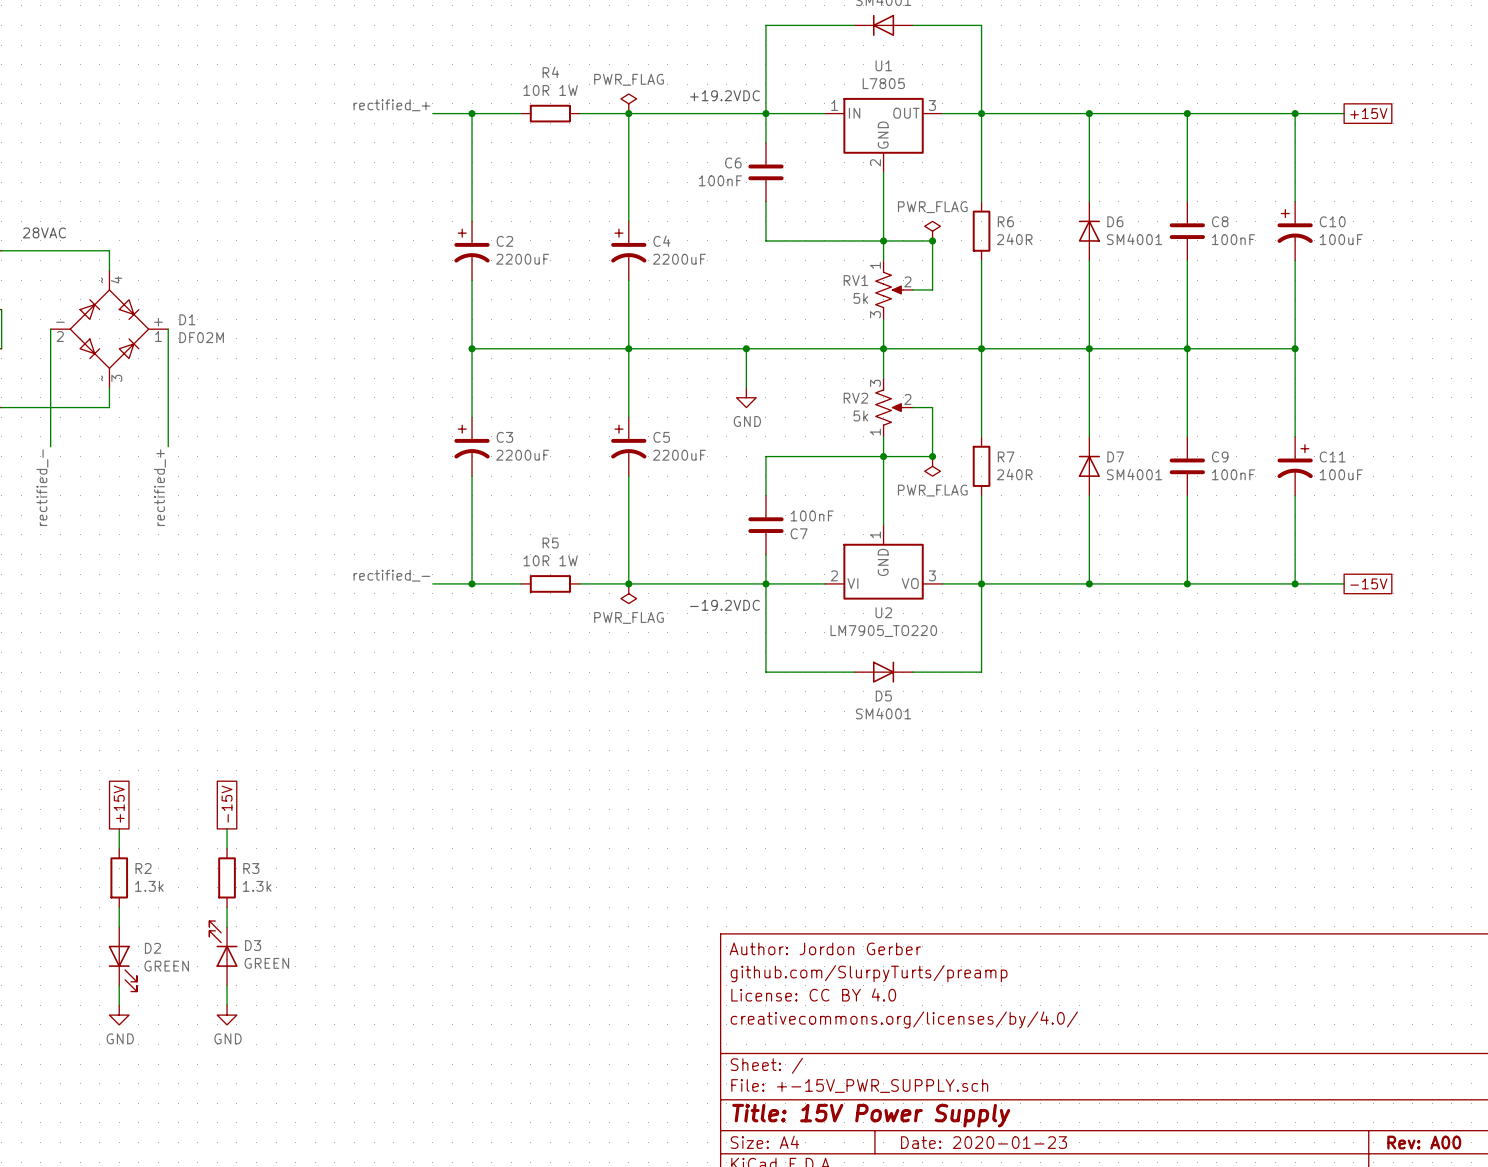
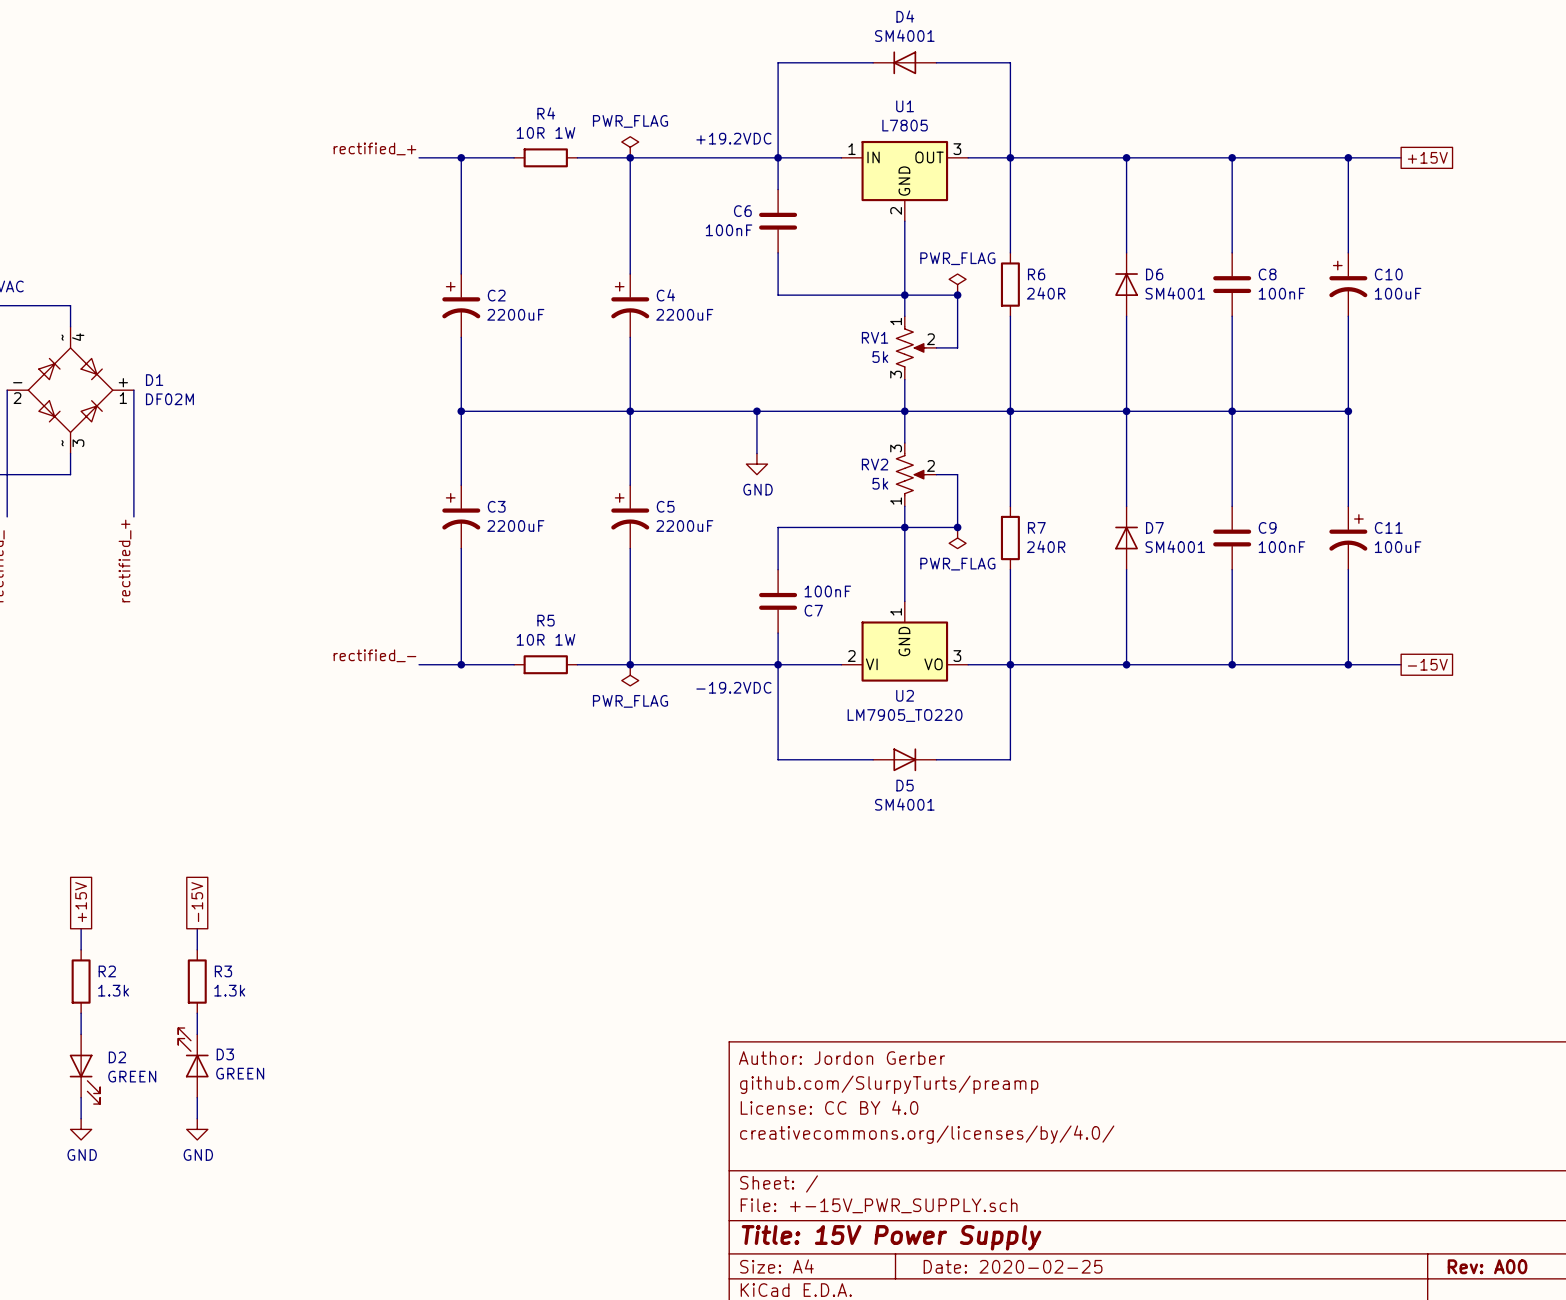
title block: Date: 2020-01-23 (984, 1142) -> Date: 2020-02-25 (1013, 1266)

